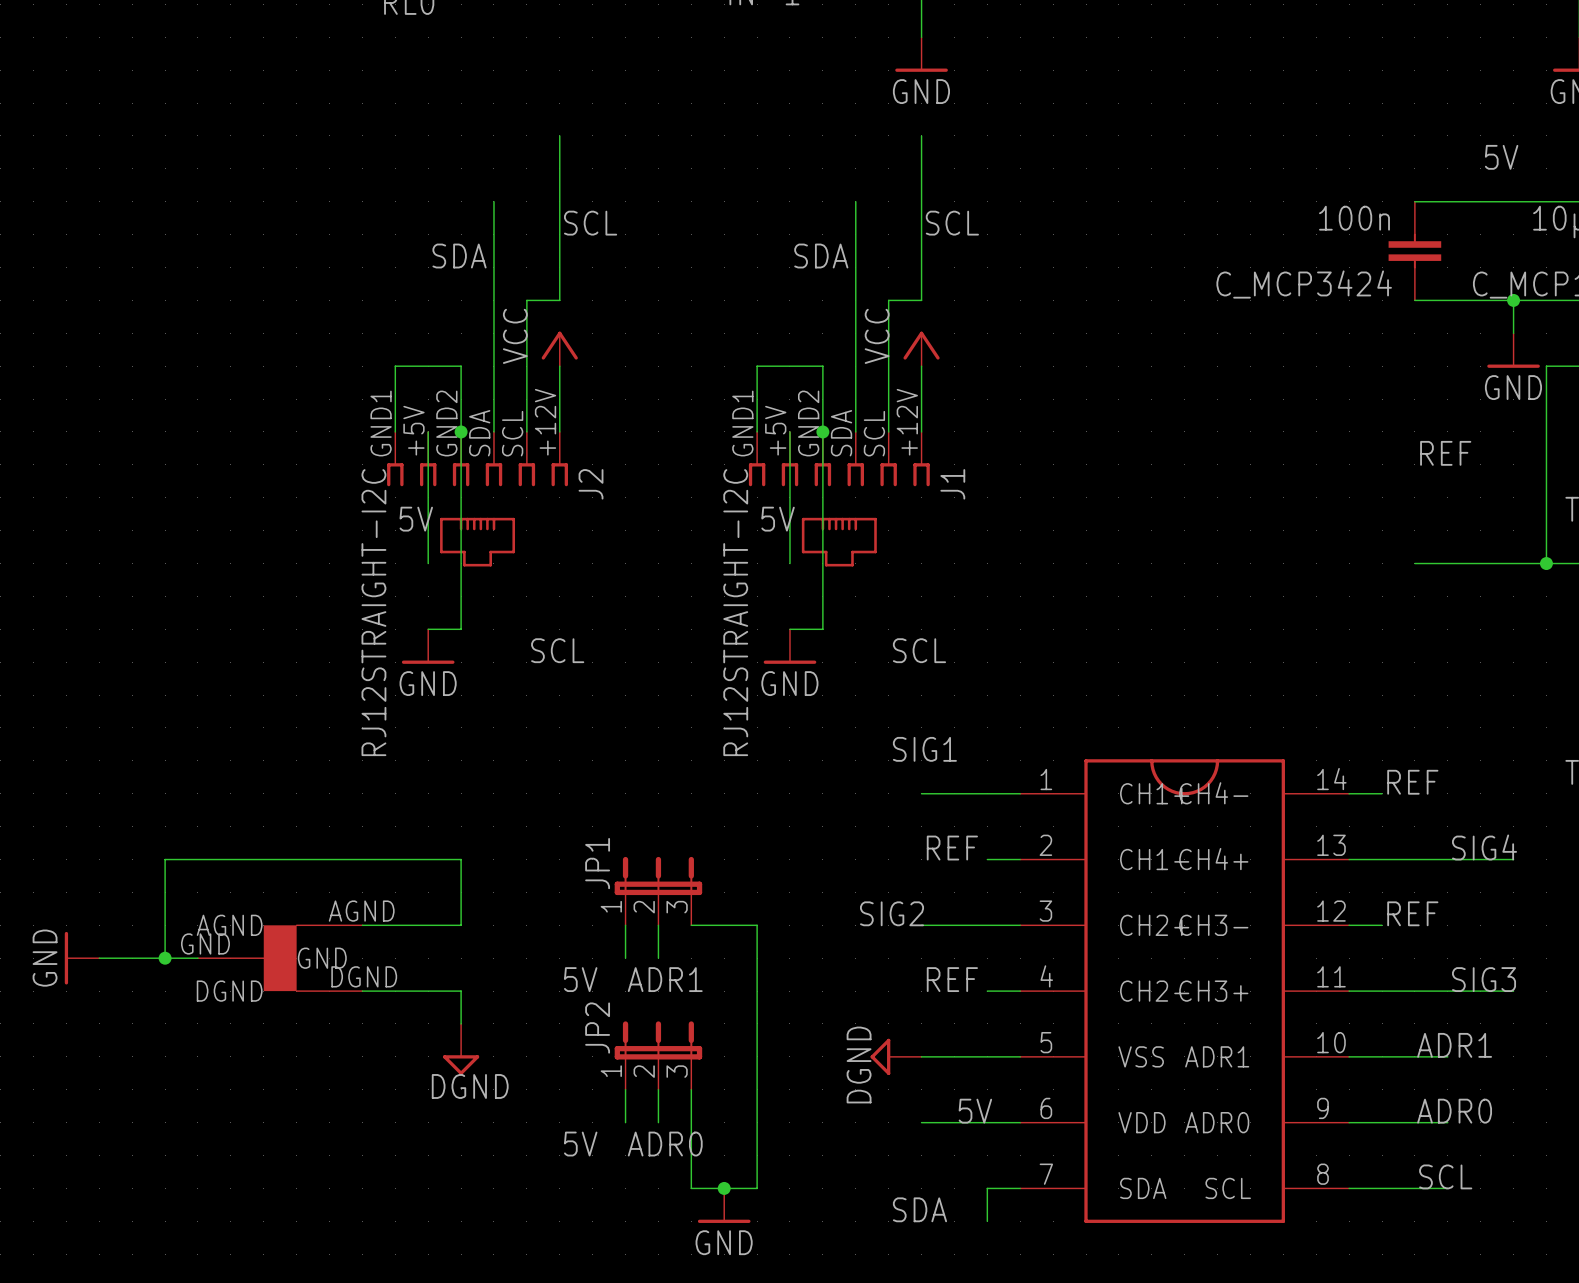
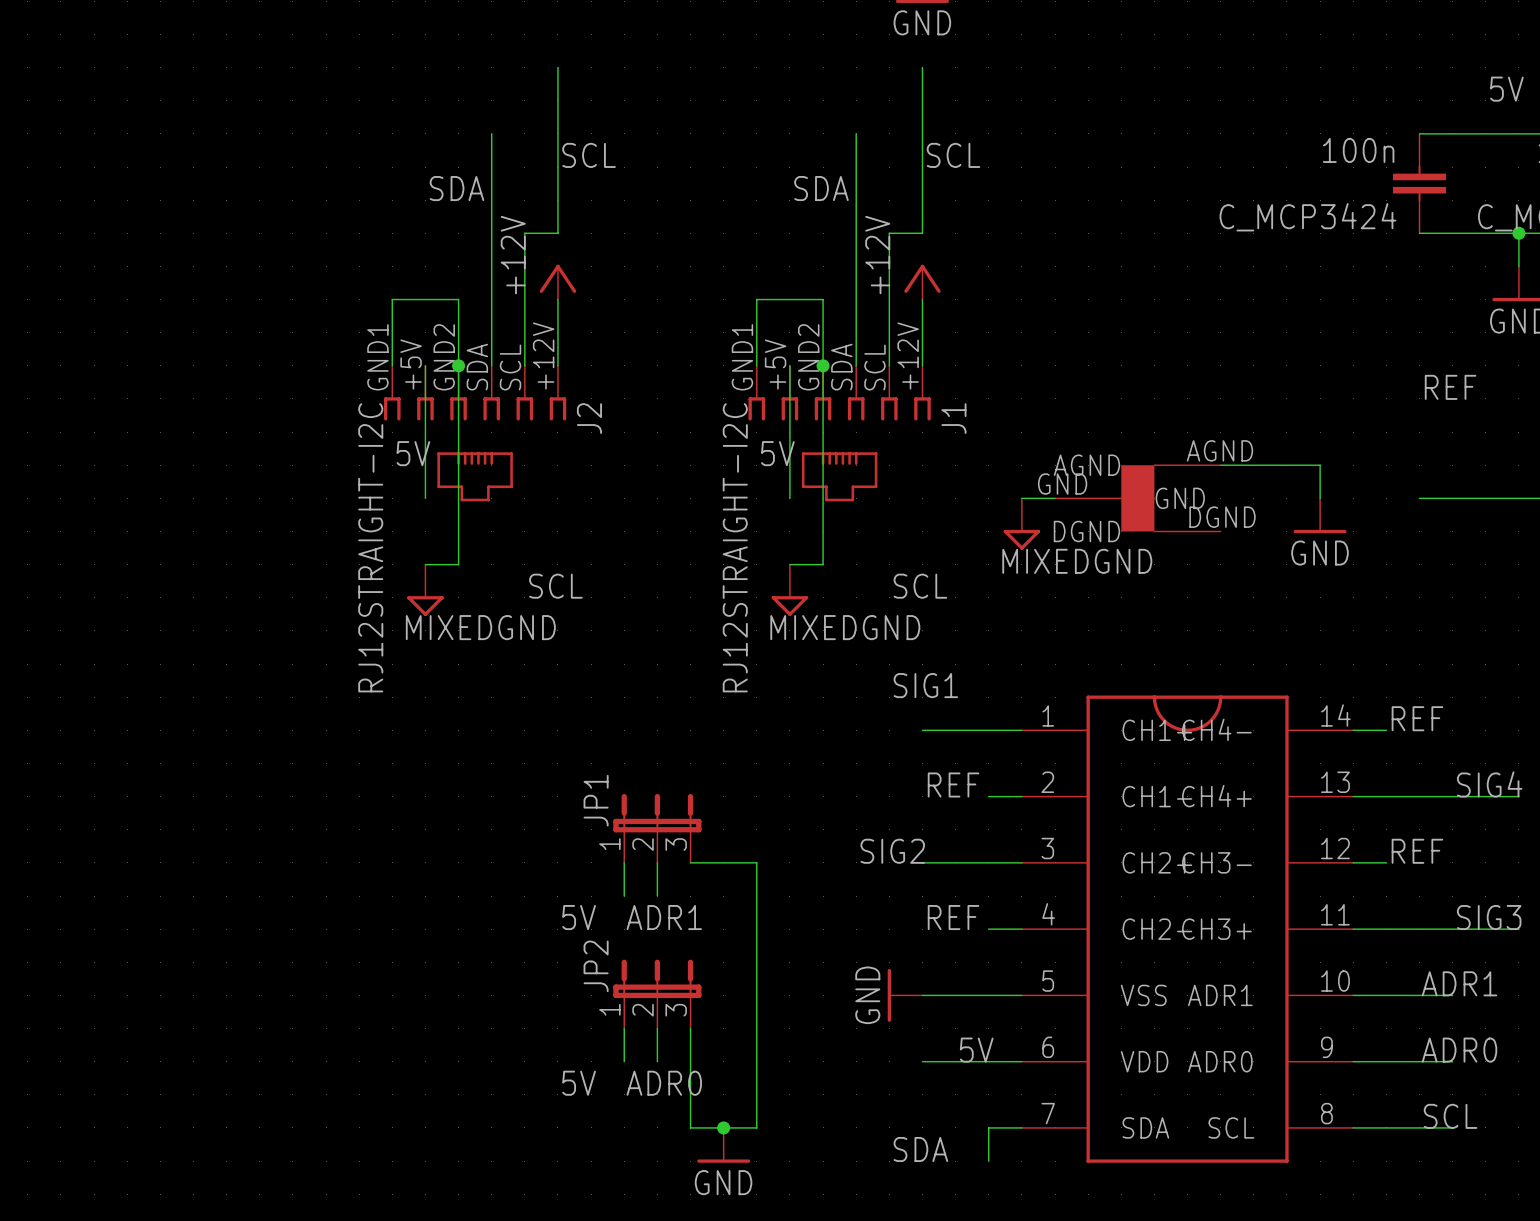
power symbol: VCC (559, 348) -> +12V (557, 282)
power symbol: VCC (921, 348) -> +12V (922, 282)
wire: none -> (1220, 465) (1320, 465) (1320, 498)
wire: none -> (1021, 498) (1055, 498)
part: none -> (1137, 498)
power symbol: none -> GND (1320, 515)
power symbol: none -> MIXEDGND (1021, 524)
power symbol: GND (428, 646) -> MIXEDGND (425, 590)
power symbol: GND (789, 646) -> MIXEDGND (789, 590)
wire: (362, 925) (461, 925) (461, 859) (165, 859) (165, 958) -> none
power symbol: GND (82, 958) -> none
wire: (99, 958) (197, 958) -> none
junction: (165, 958) -> none
part: (280, 958) -> none
wire: (362, 991) (461, 991) (461, 1023) -> none
power symbol: DGND (461, 1049) -> none
power symbol: DGND (896, 1056) -> GND (905, 995)

